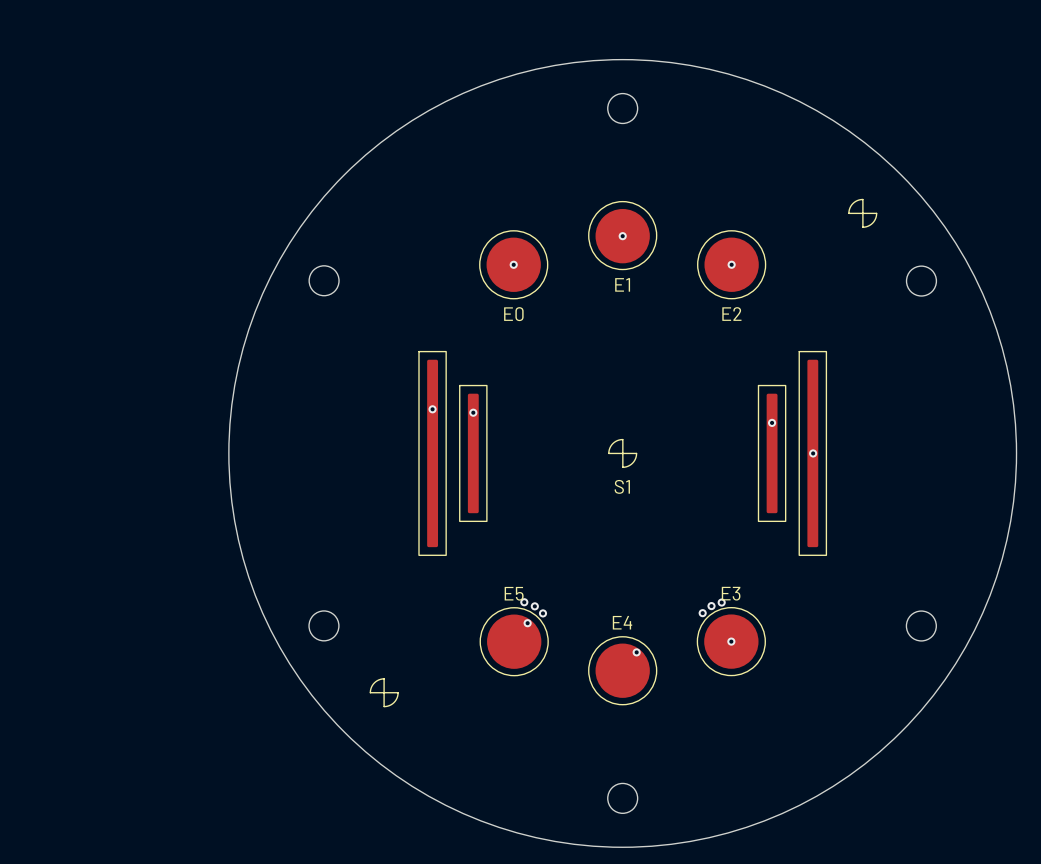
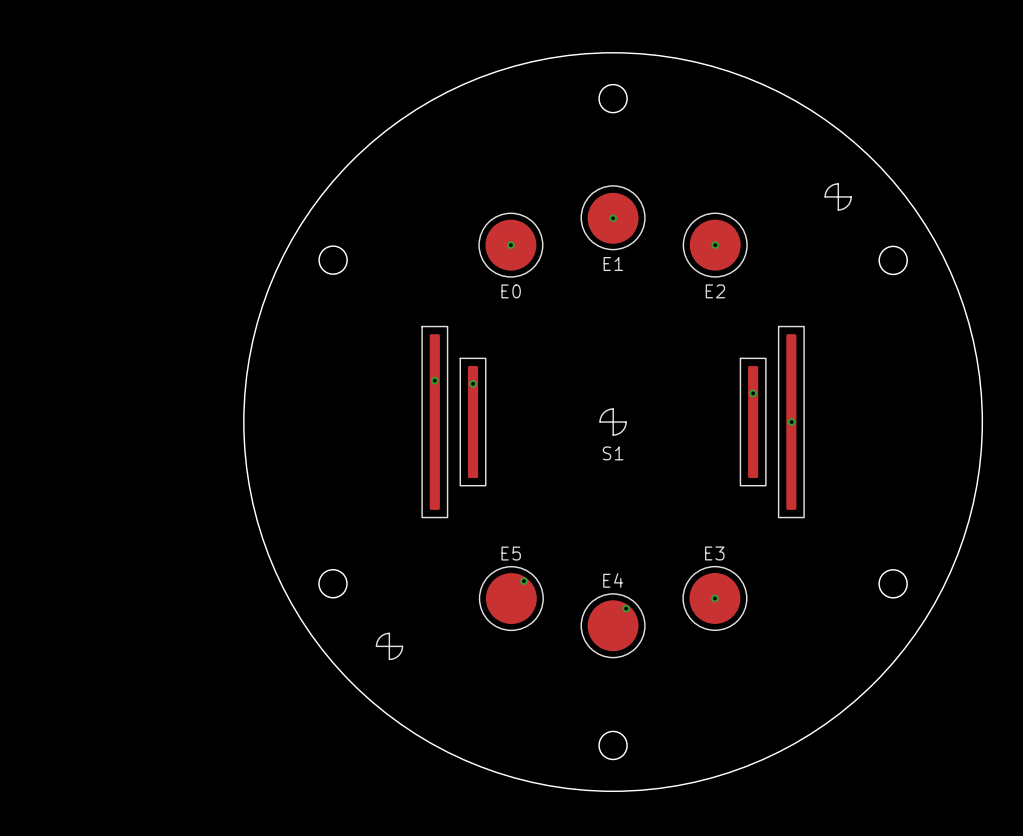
via: (524, 602) -> none
via: (721, 602) -> none
via: (534, 606) -> none
via: (711, 606) -> none
via: (542, 613) -> none
via: (702, 613) -> none

